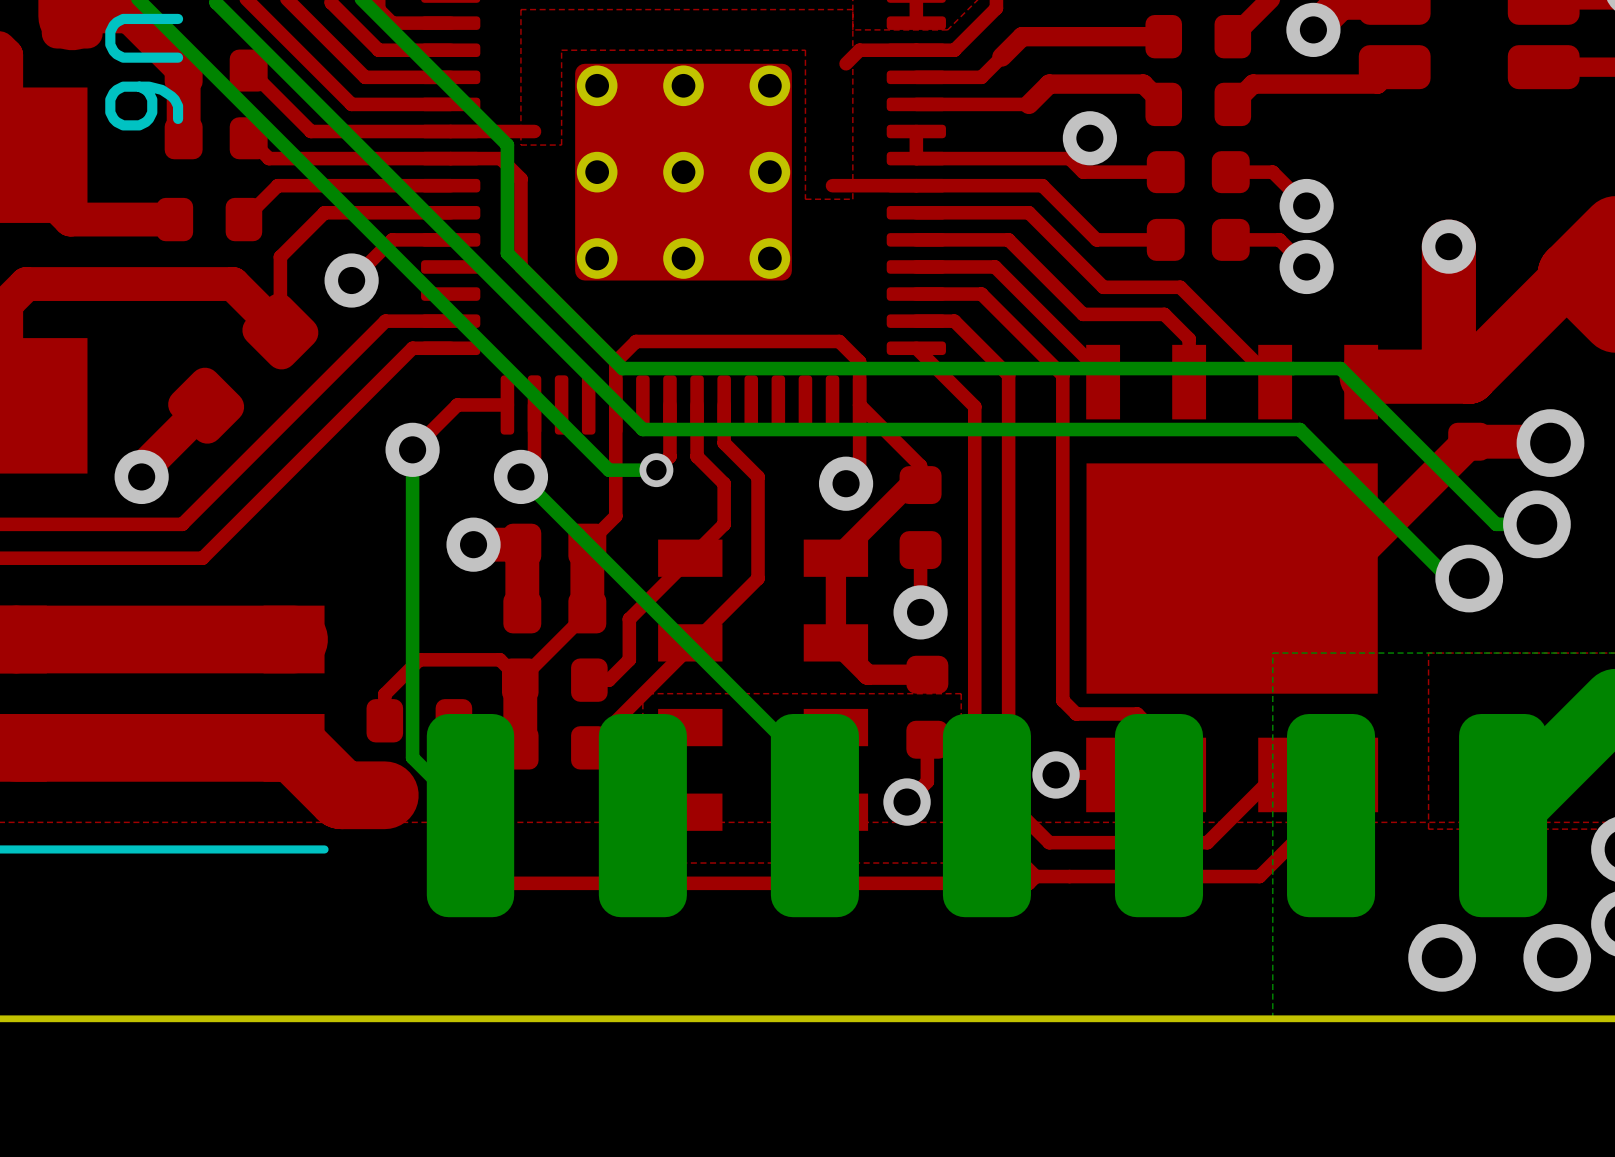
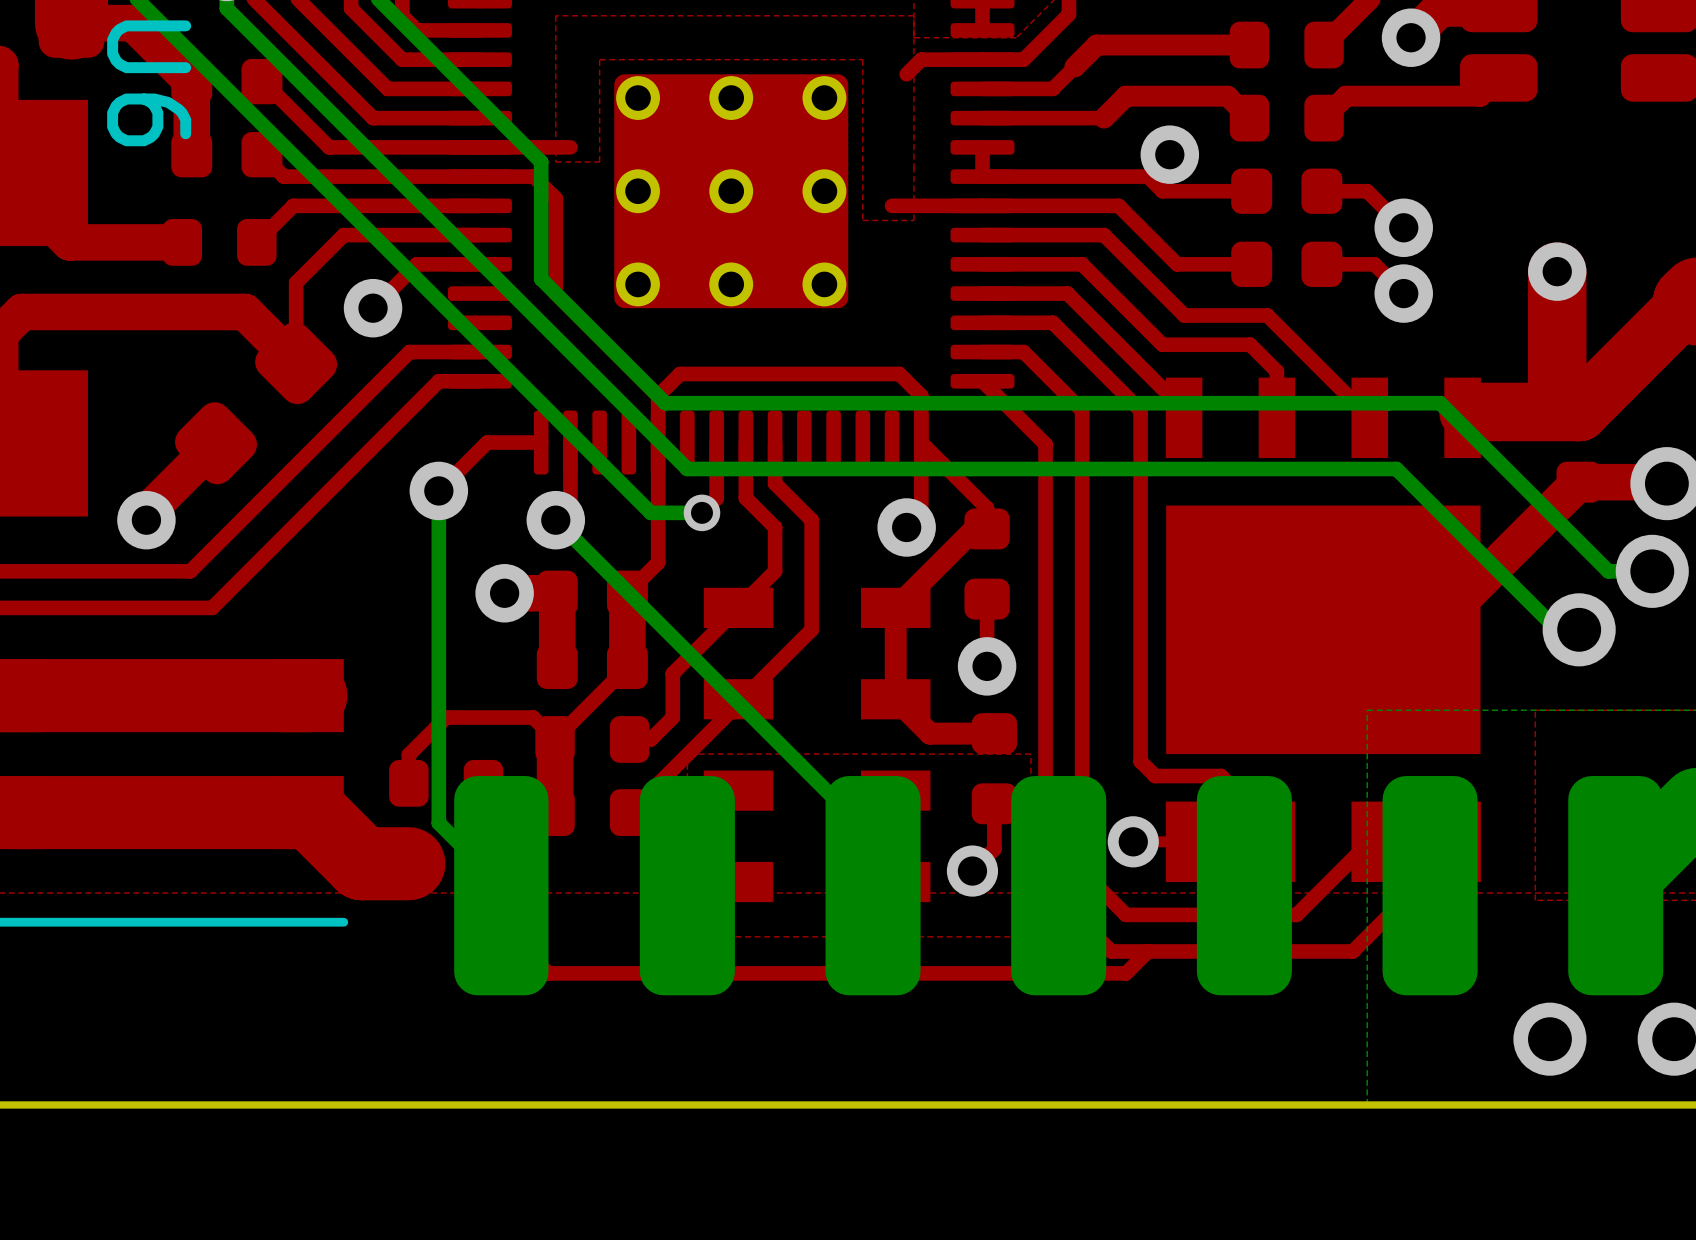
top track: (1035, 876) (1028, 883) (500, 883) -> (1147, 951) (1125, 973) (548, 973) (533, 958)

